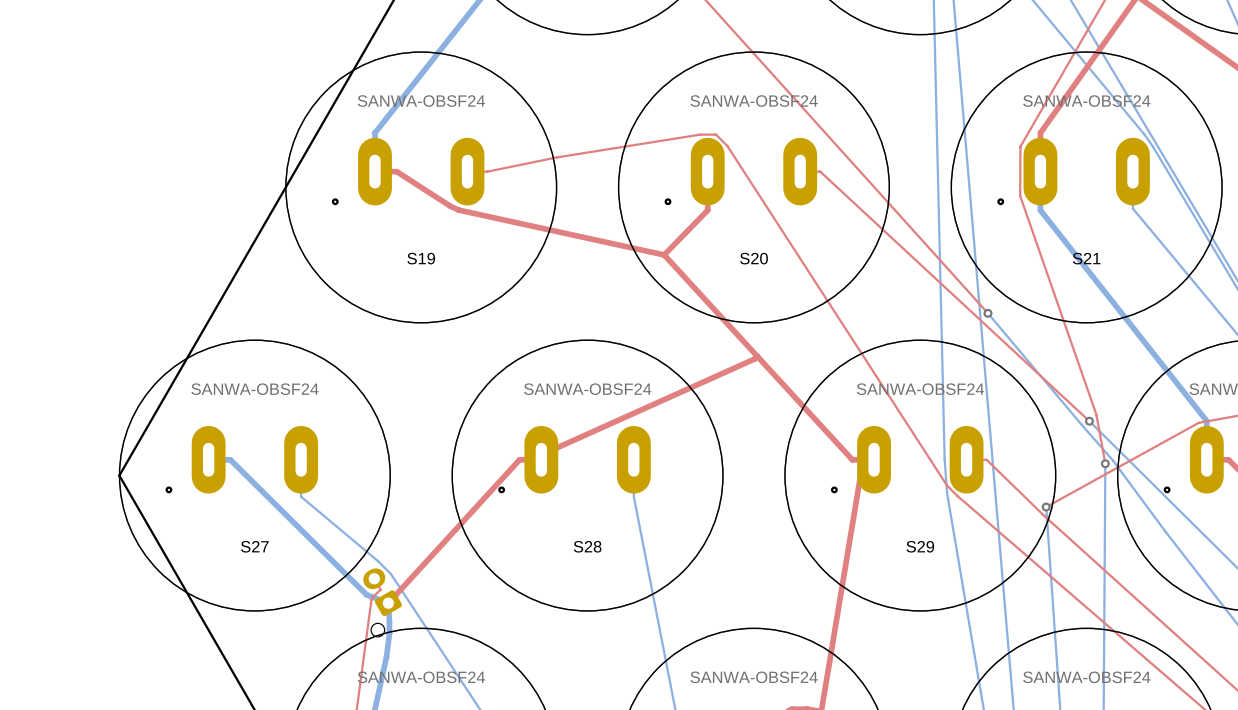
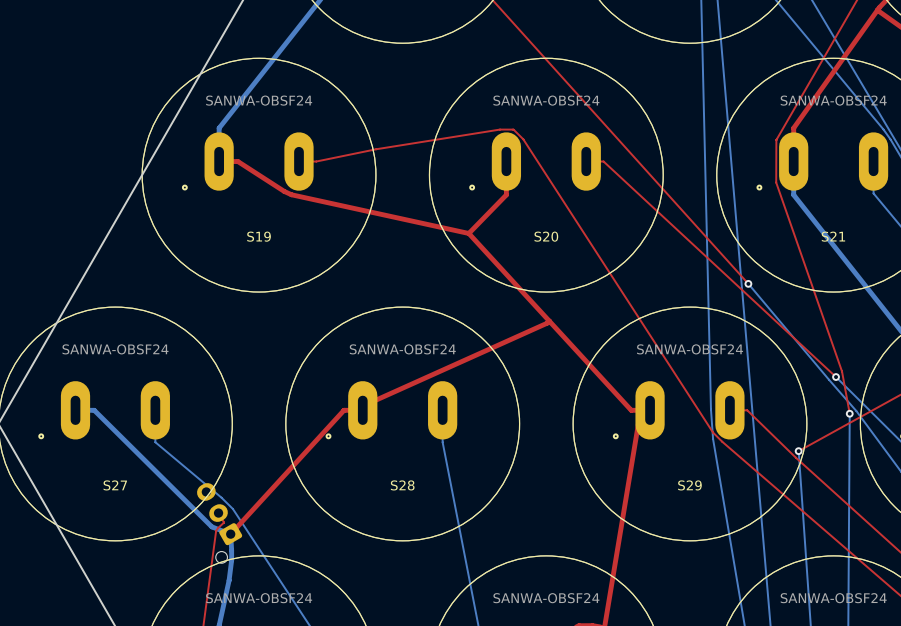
part: none -> (219, 523)
part: (382, 602) -> none

